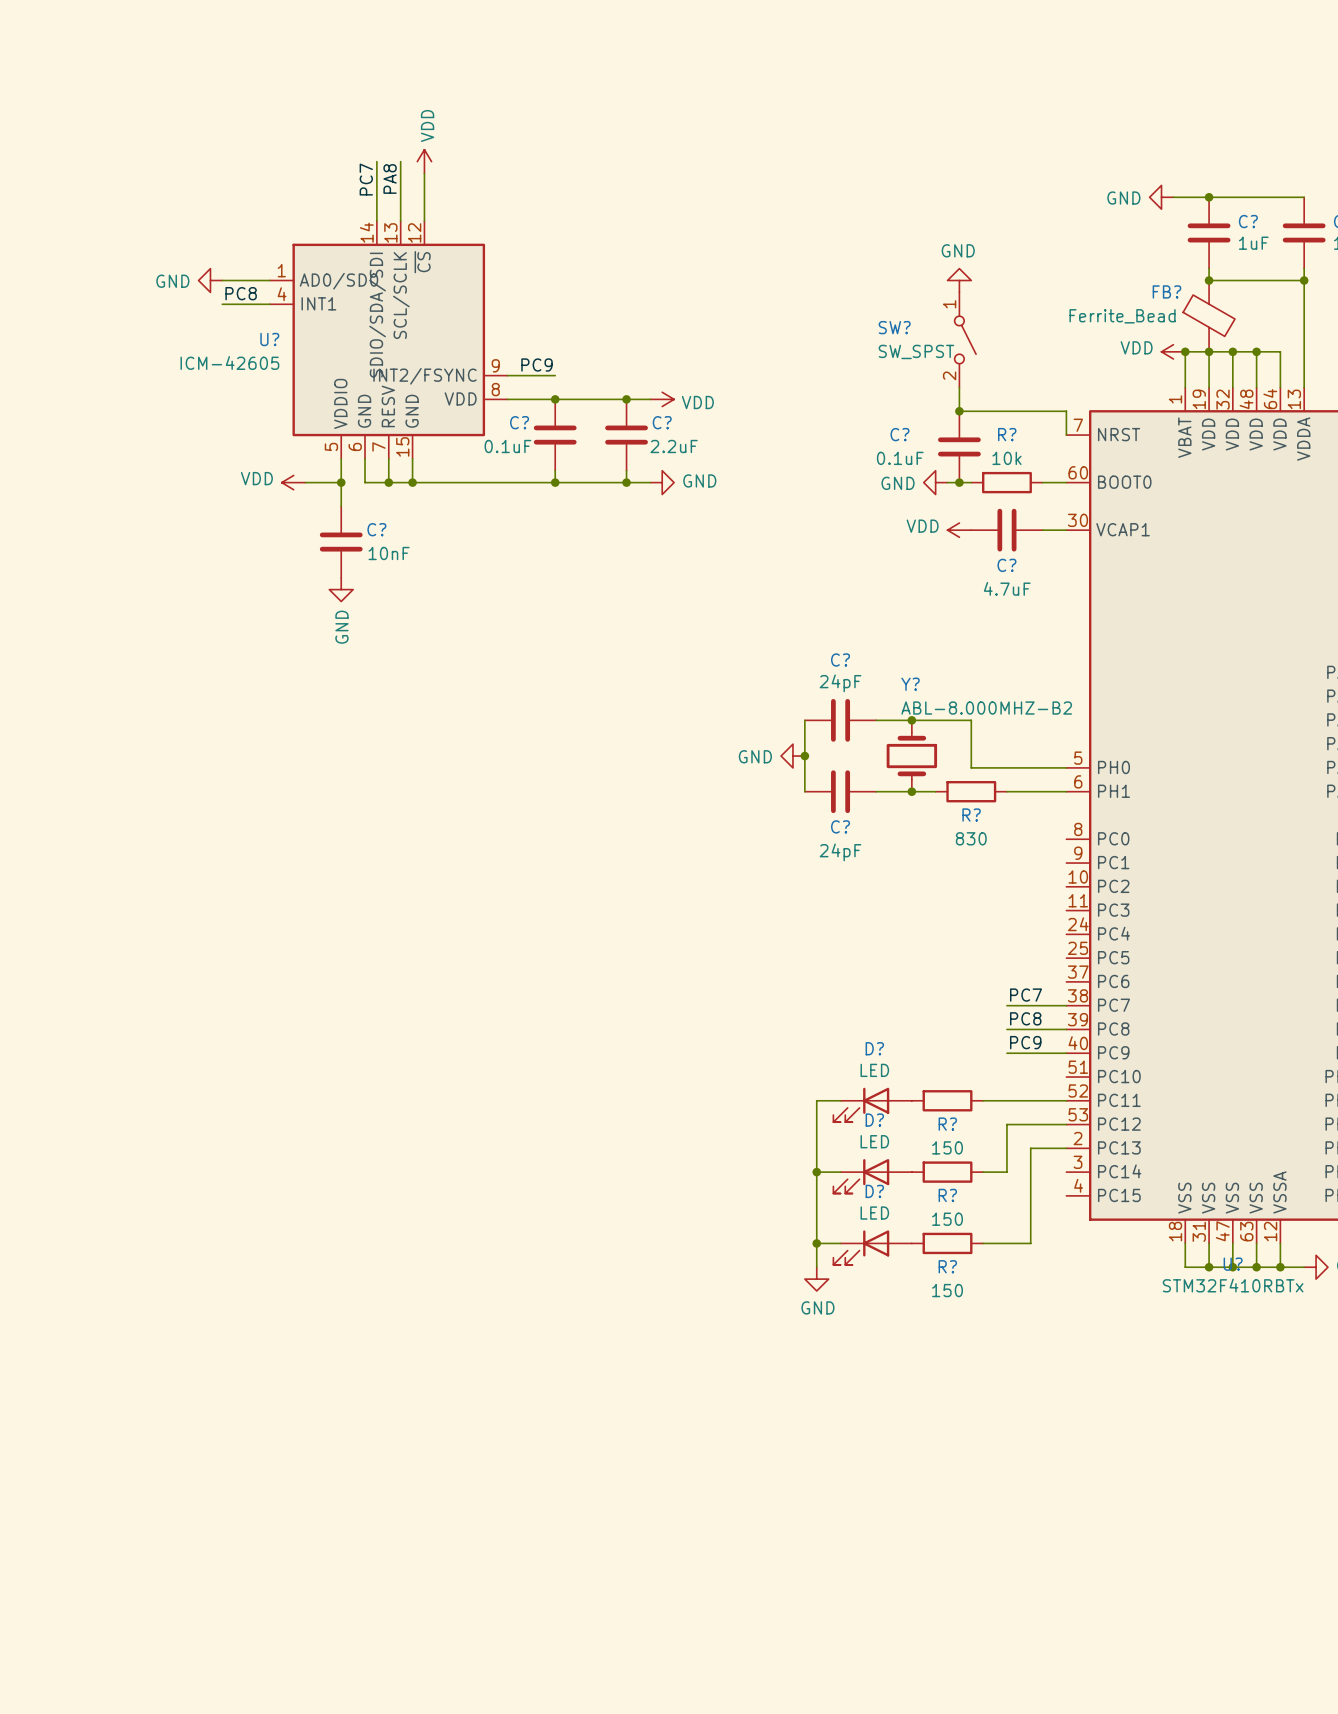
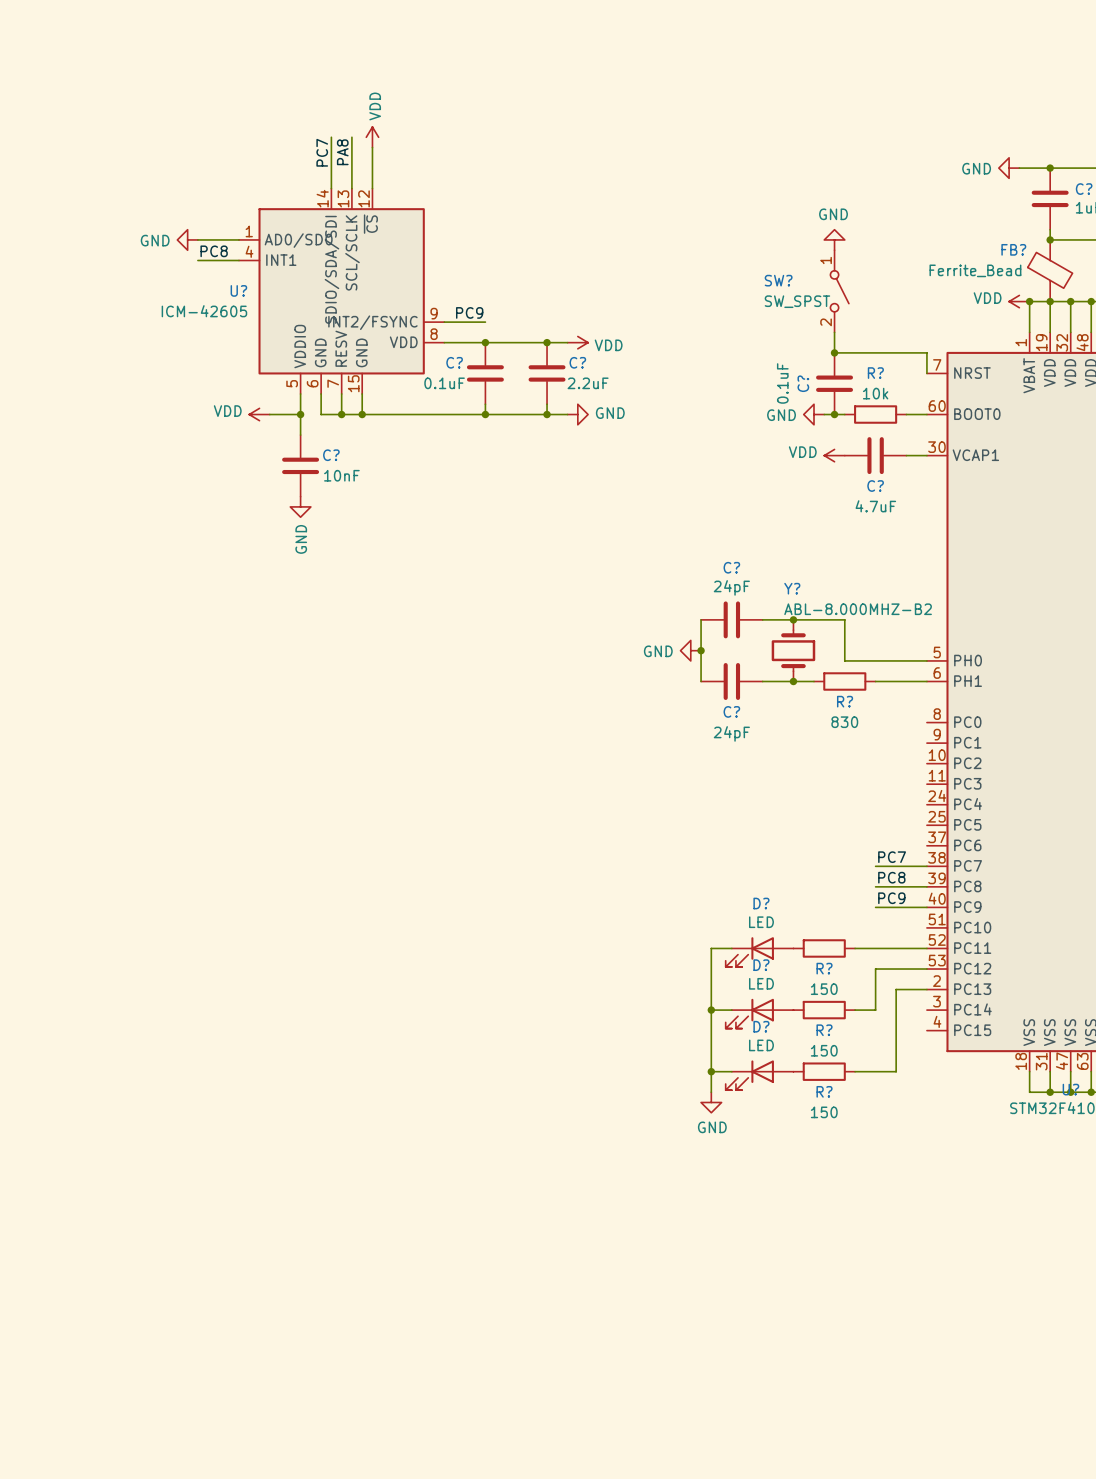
C? name rotation: 0° (899, 434) -> 90° counterclockwise (803, 383)
C? value rotation: 0° (900, 458) -> 90° counterclockwise (782, 383)

